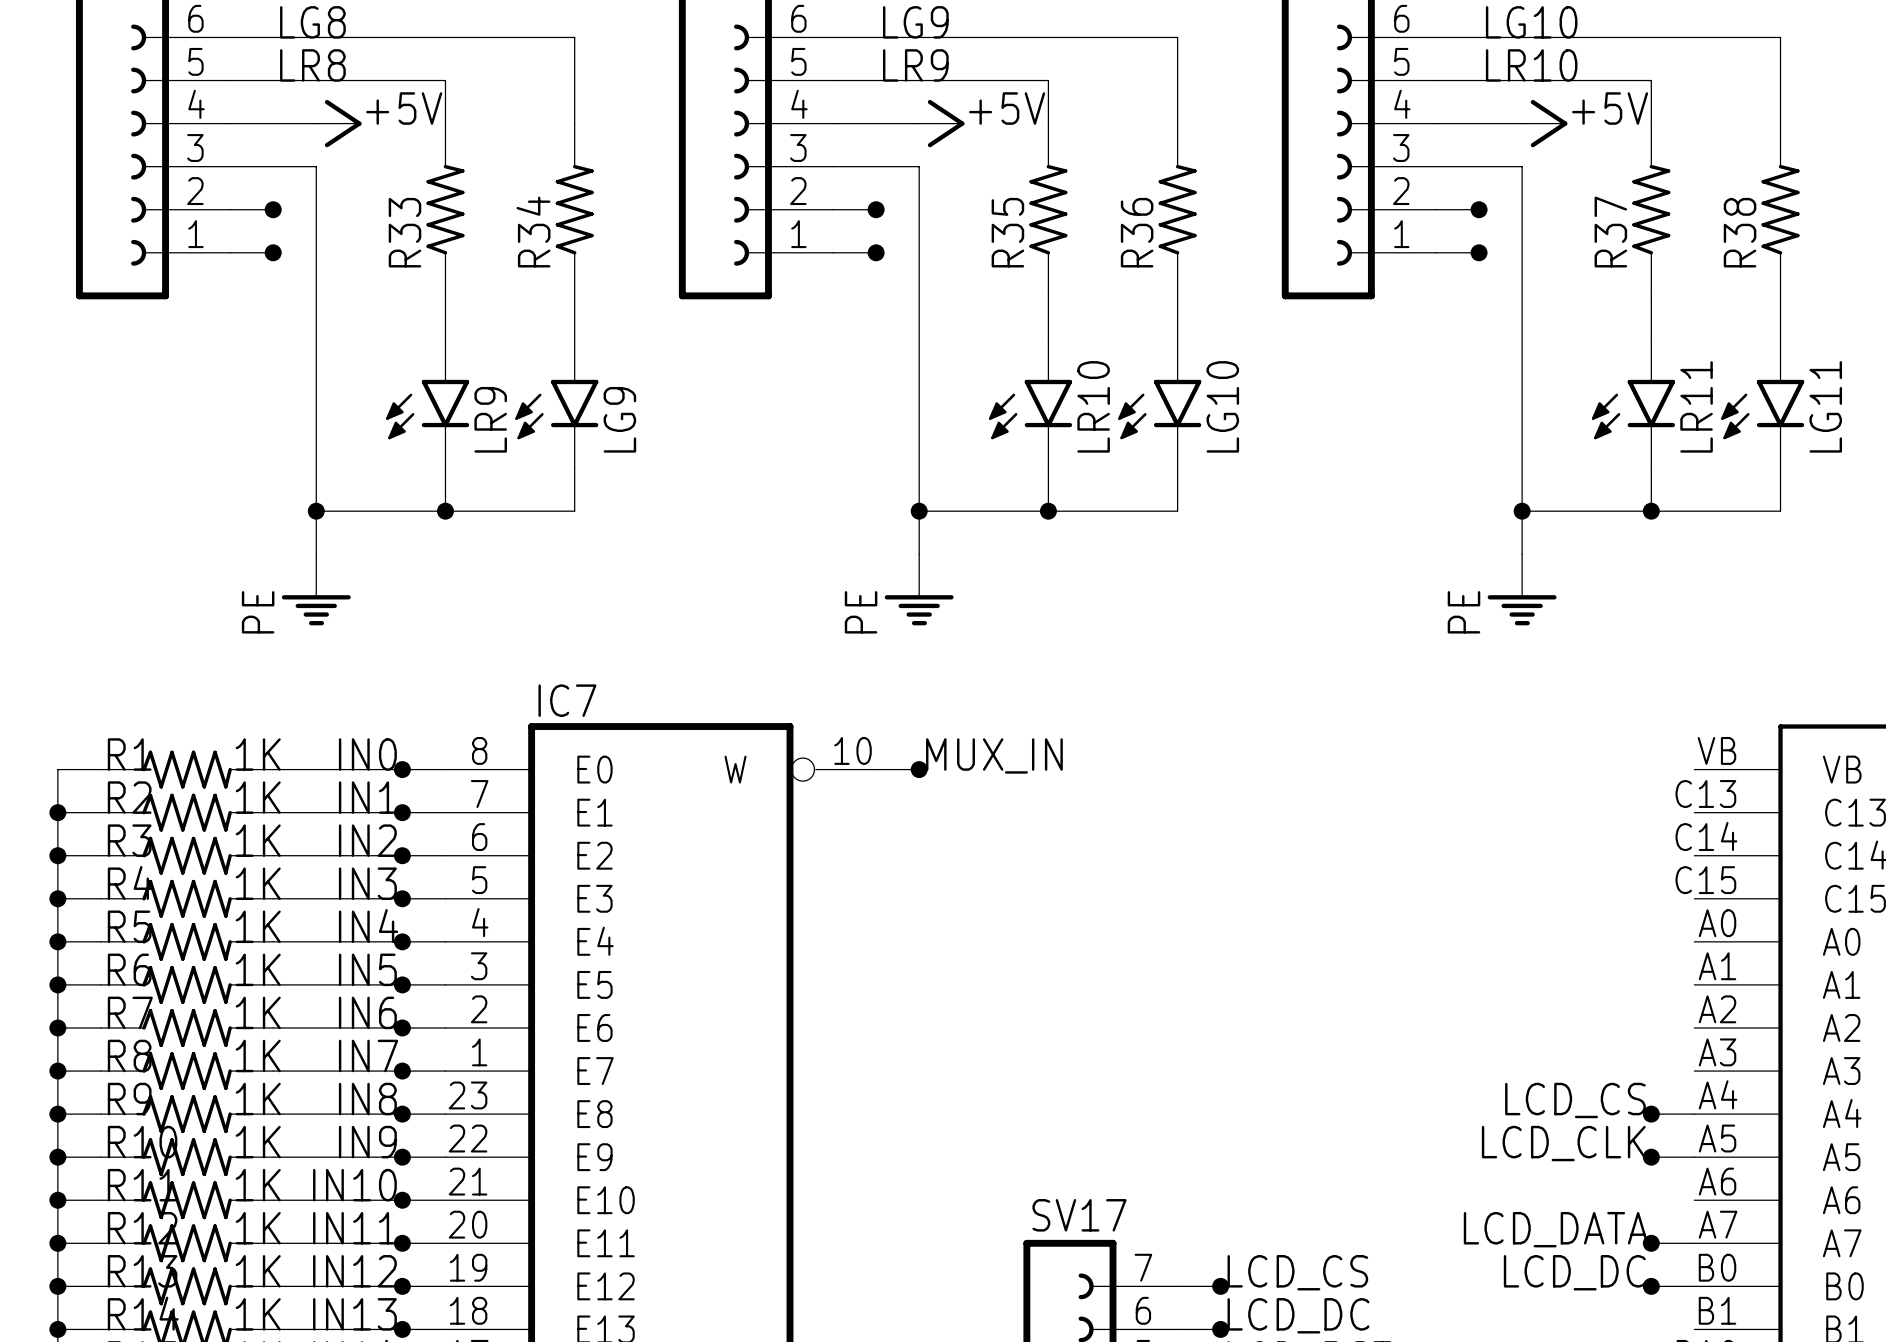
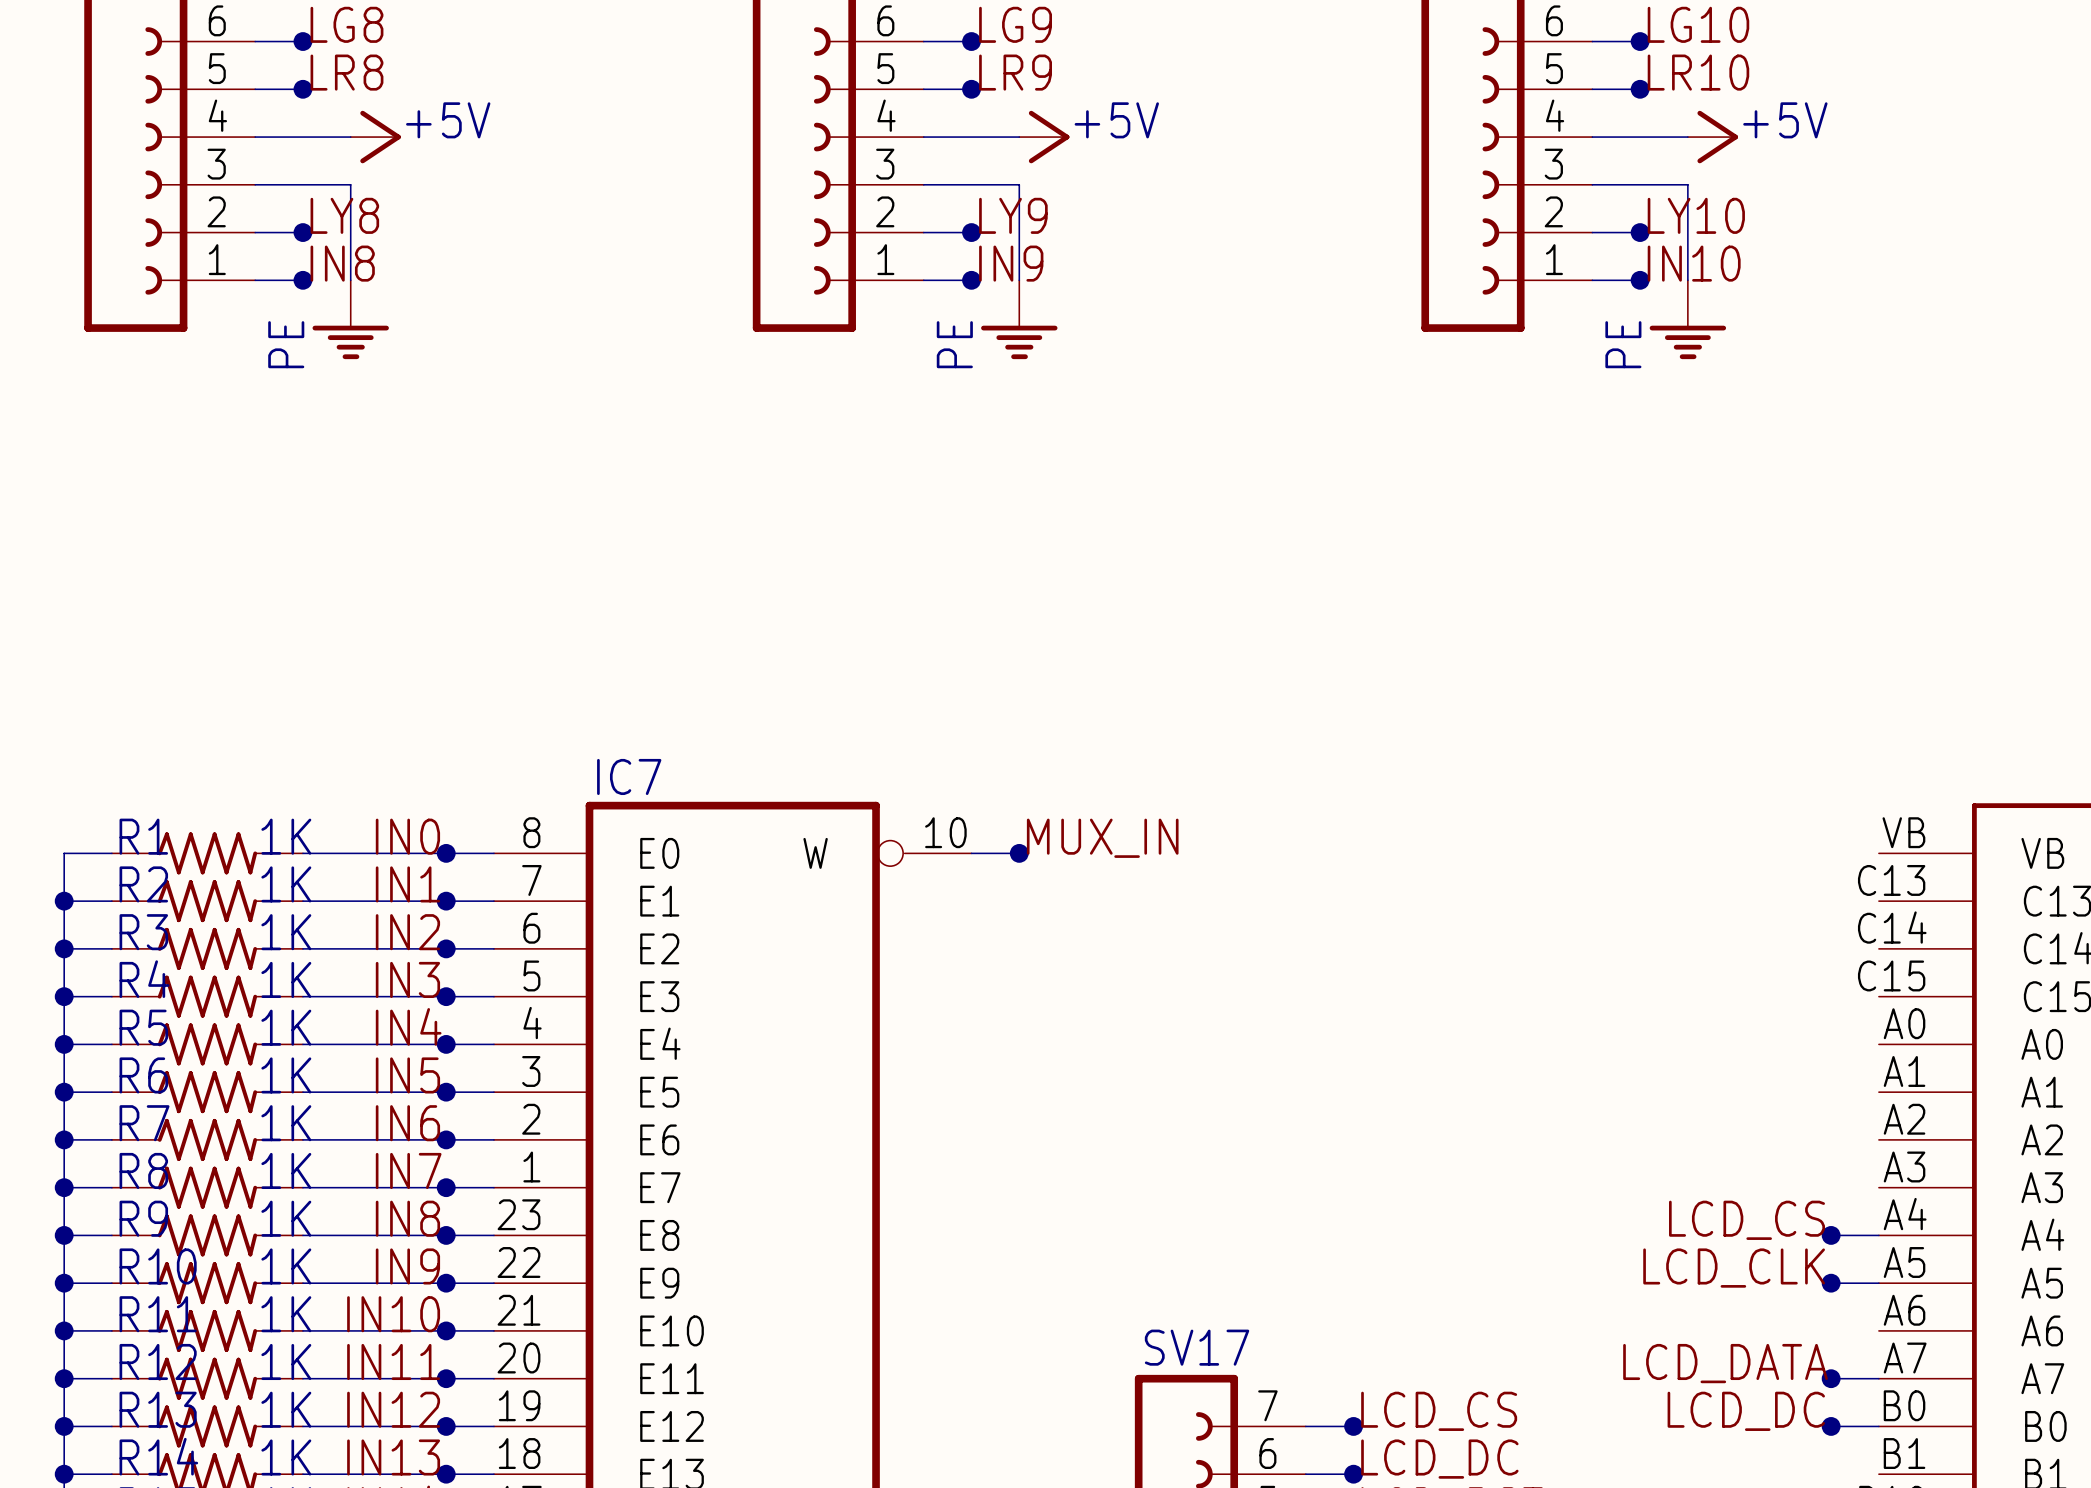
wire: (273, 37) (574, 37) (574, 123) -> none
junction: none -> (302, 41)
wire: (876, 37) (1177, 37) (1177, 123) -> none
junction: none -> (971, 41)
wire: (1479, 37) (1780, 37) (1780, 123) -> none
junction: none -> (1640, 41)
wire: (273, 80) (445, 80) (445, 123) -> none
junction: none -> (302, 89)
wire: (876, 80) (1048, 80) (1048, 123) -> none
junction: none -> (971, 89)
wire: (1479, 80) (1651, 80) (1651, 123) -> none
junction: none -> (1640, 89)
label: none -> LY8 (344, 215)
label: none -> LY9 (1013, 215)
label: none -> LY10 (1696, 215)
R33: (445, 209) -> none
R34: (574, 209) -> none
R35: (1048, 209) -> none
R36: (1177, 209) -> none
R37: (1651, 209) -> none
R38: (1780, 209) -> none
label: none -> IN8 (342, 263)
label: none -> IN9 (1011, 263)
label: none -> IN10 (1694, 263)
wire: (316, 252) (316, 554) -> none
wire: (919, 252) (919, 554) -> none
wire: (1522, 252) (1522, 554) -> none
wire: (445, 295) (445, 338) -> none
wire: (574, 295) (574, 338) -> none
wire: (1048, 295) (1048, 338) -> none
wire: (1177, 295) (1177, 338) -> none
wire: (1651, 295) (1651, 338) -> none
wire: (1780, 295) (1780, 338) -> none
LR9: (427, 403) -> none
LG9: (556, 403) -> none
LR10: (1030, 403) -> none
LG10: (1159, 403) -> none
LR11: (1633, 403) -> none
LG11: (1762, 403) -> none
wire: (445, 468) (445, 511) -> none
wire: (574, 468) (574, 511) (316, 511) -> none
wire: (1048, 468) (1048, 511) -> none
wire: (1177, 468) (1177, 511) (919, 511) -> none
wire: (1651, 468) (1651, 511) -> none
wire: (1780, 468) (1780, 511) (1522, 511) -> none
junction: (316, 511) -> none
junction: (445, 511) -> none
junction: (919, 511) -> none
junction: (1048, 511) -> none
junction: (1522, 511) -> none
junction: (1651, 511) -> none
power symbol position: PE (316, 589) -> PE (350, 319)
power symbol position: PE (919, 589) -> PE (1019, 319)
power symbol position: PE (1522, 589) -> PE (1687, 319)

